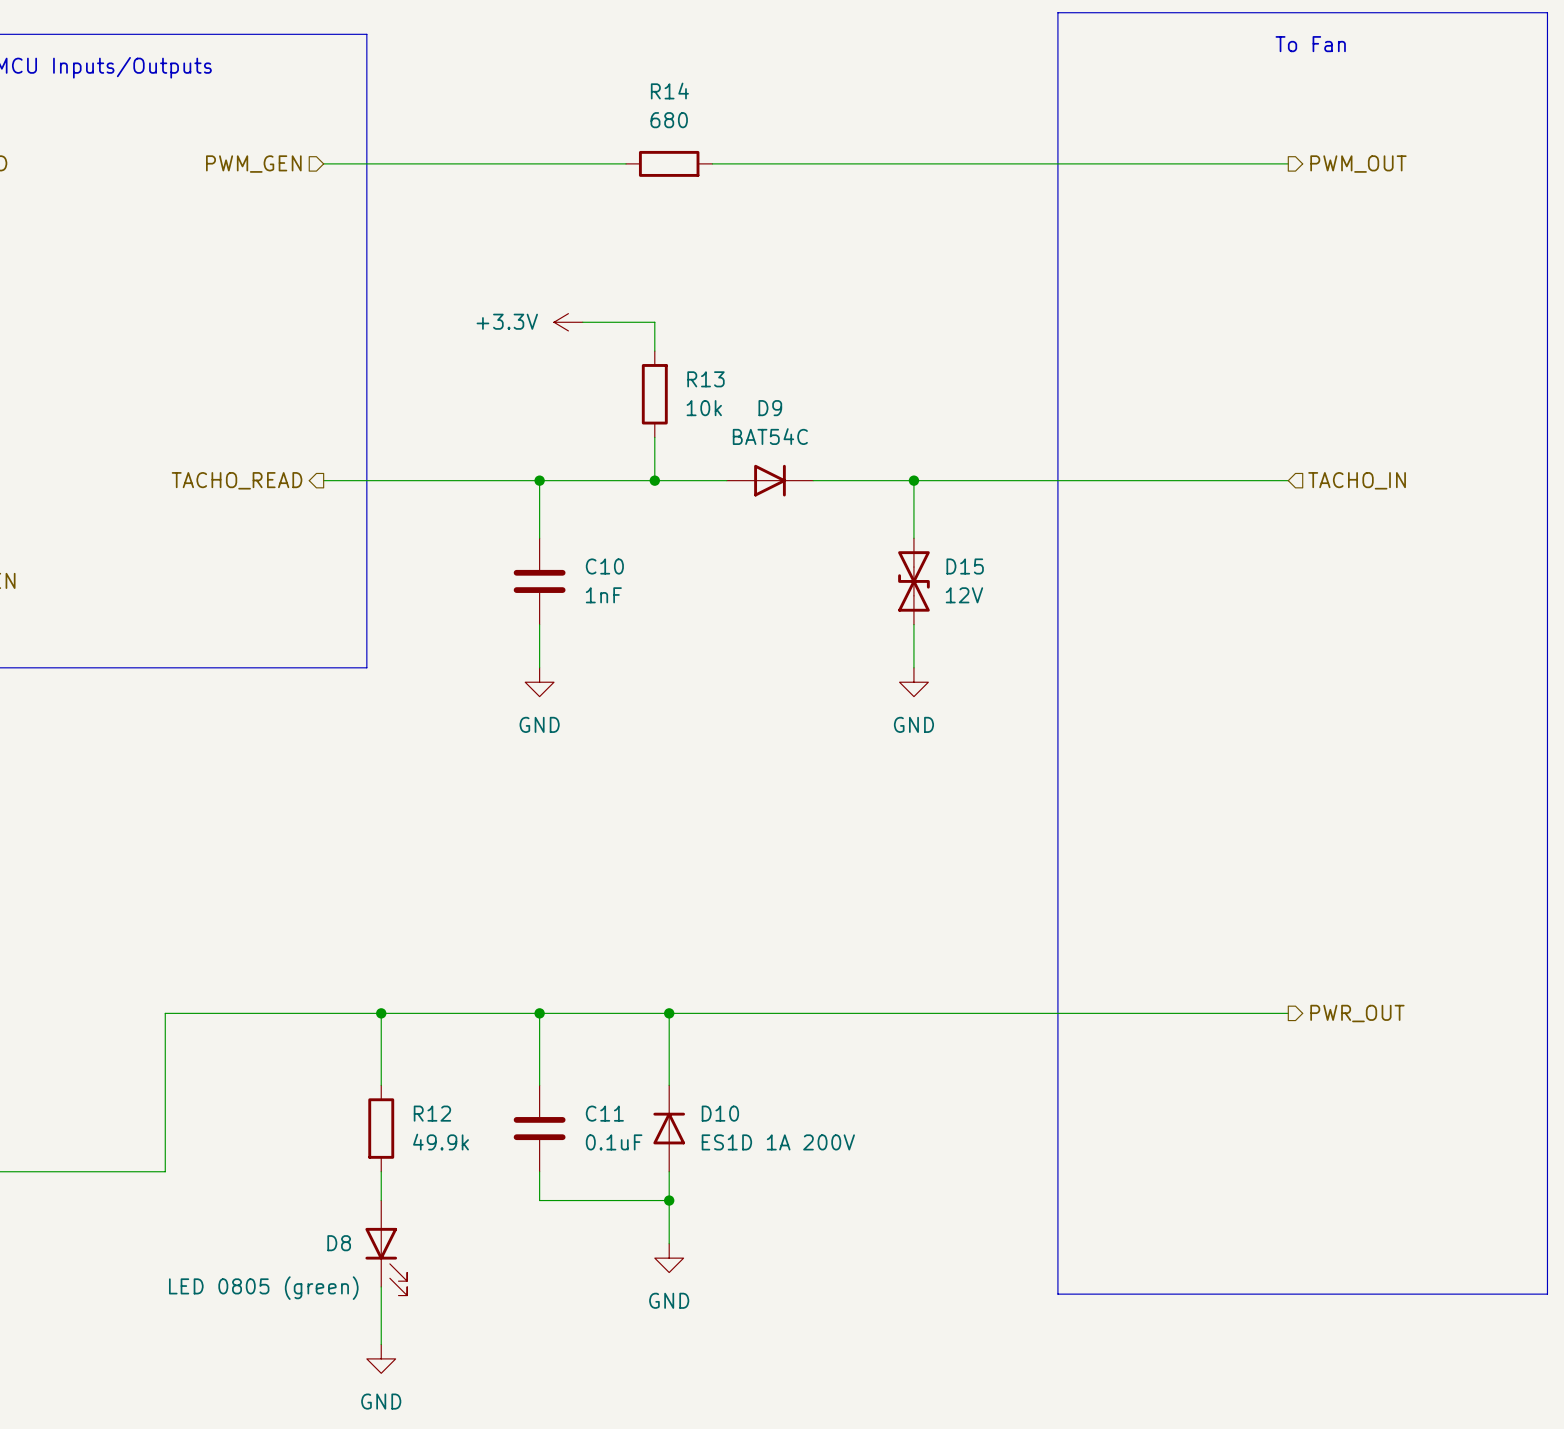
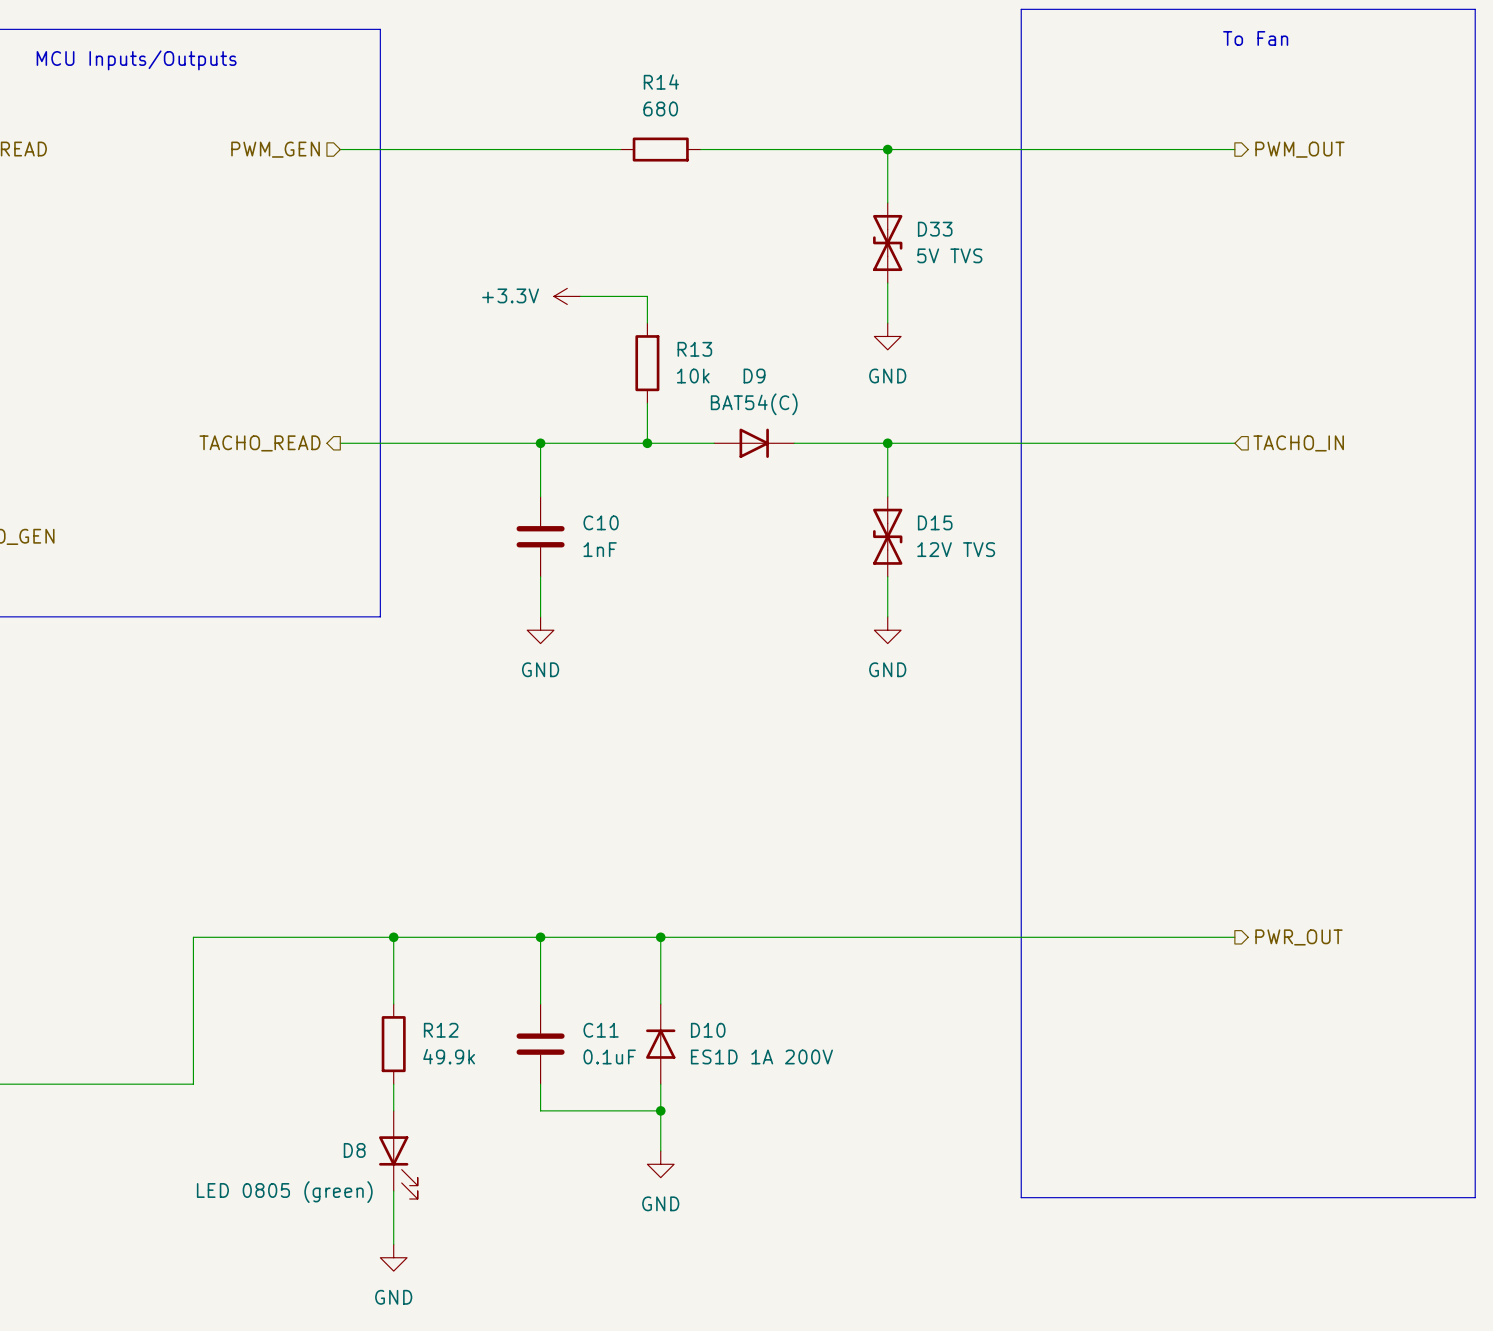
wire: none -> (887, 149) (887, 202)
junction: none -> (887, 149)
D33: none -> 5V TVS (887, 243)
wire: none -> (887, 283) (887, 323)
power symbol: none -> GND (887, 336)
D9 value: BAT54C (770, 436) -> BAT54(C) (754, 404)
D15 value: 12V (964, 595) -> 12V TVS (956, 549)

